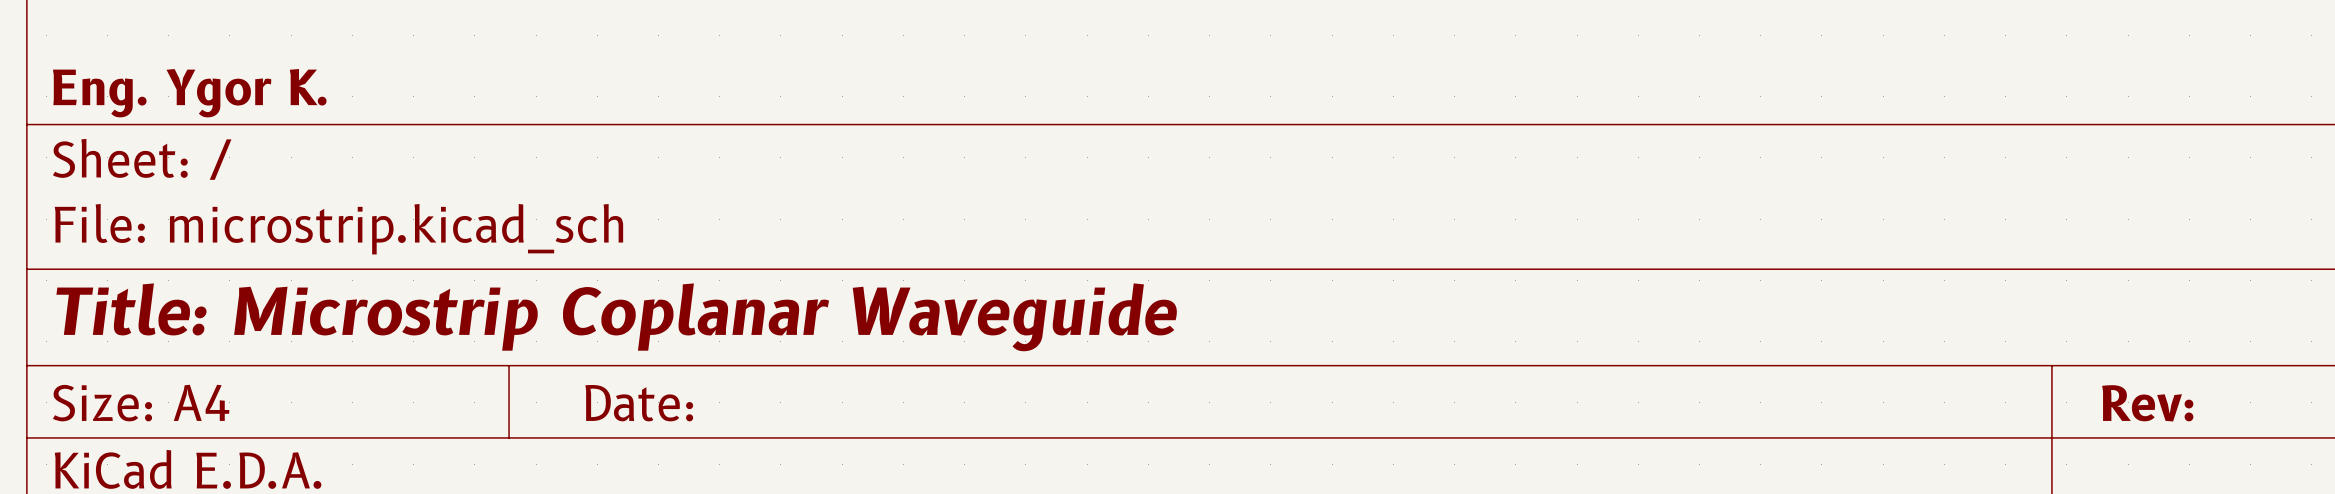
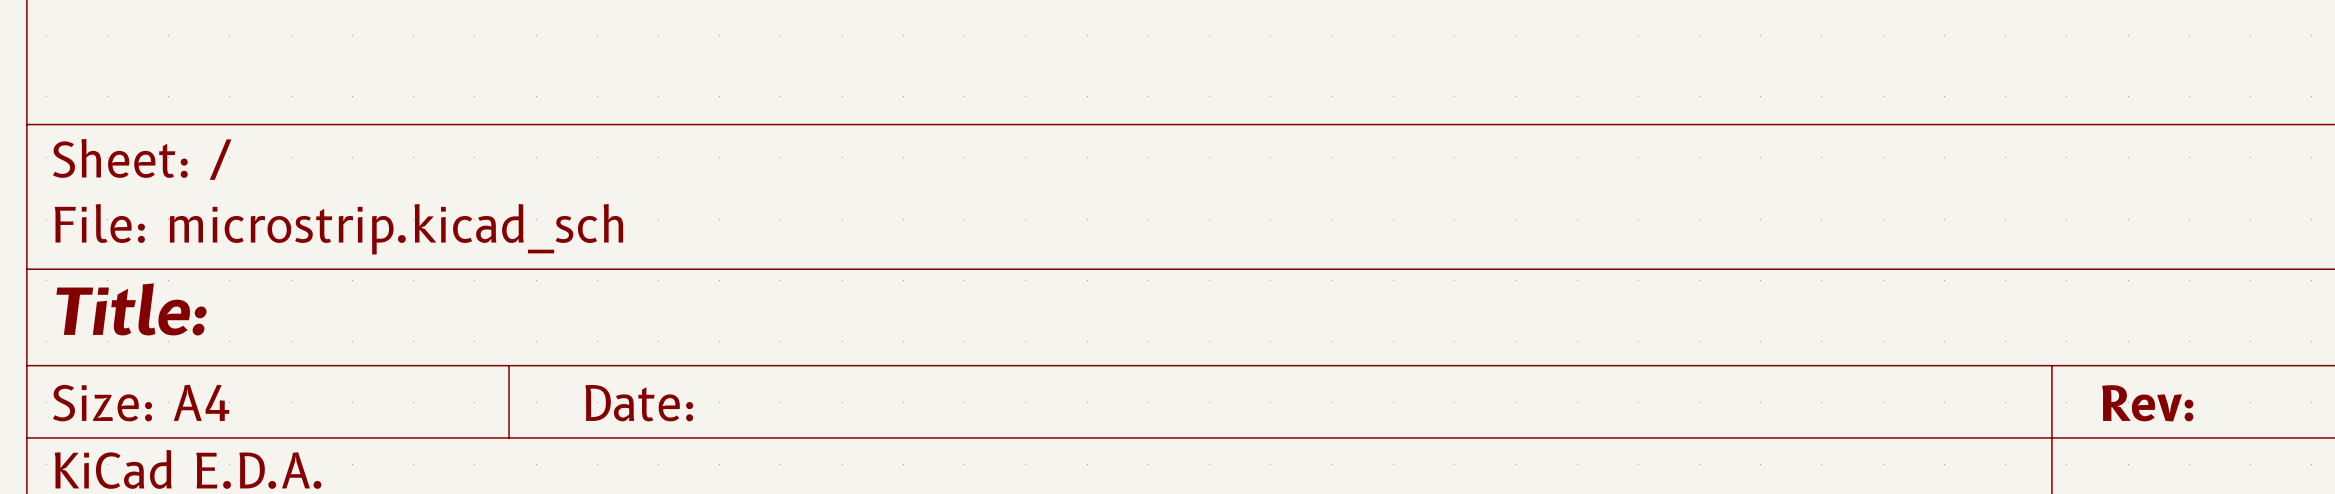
title block: Eng. Ygor K. (189, 93) -> none
title block: Title: Microstrip Coplanar Waveguide (616, 317) -> Title: (131, 309)

